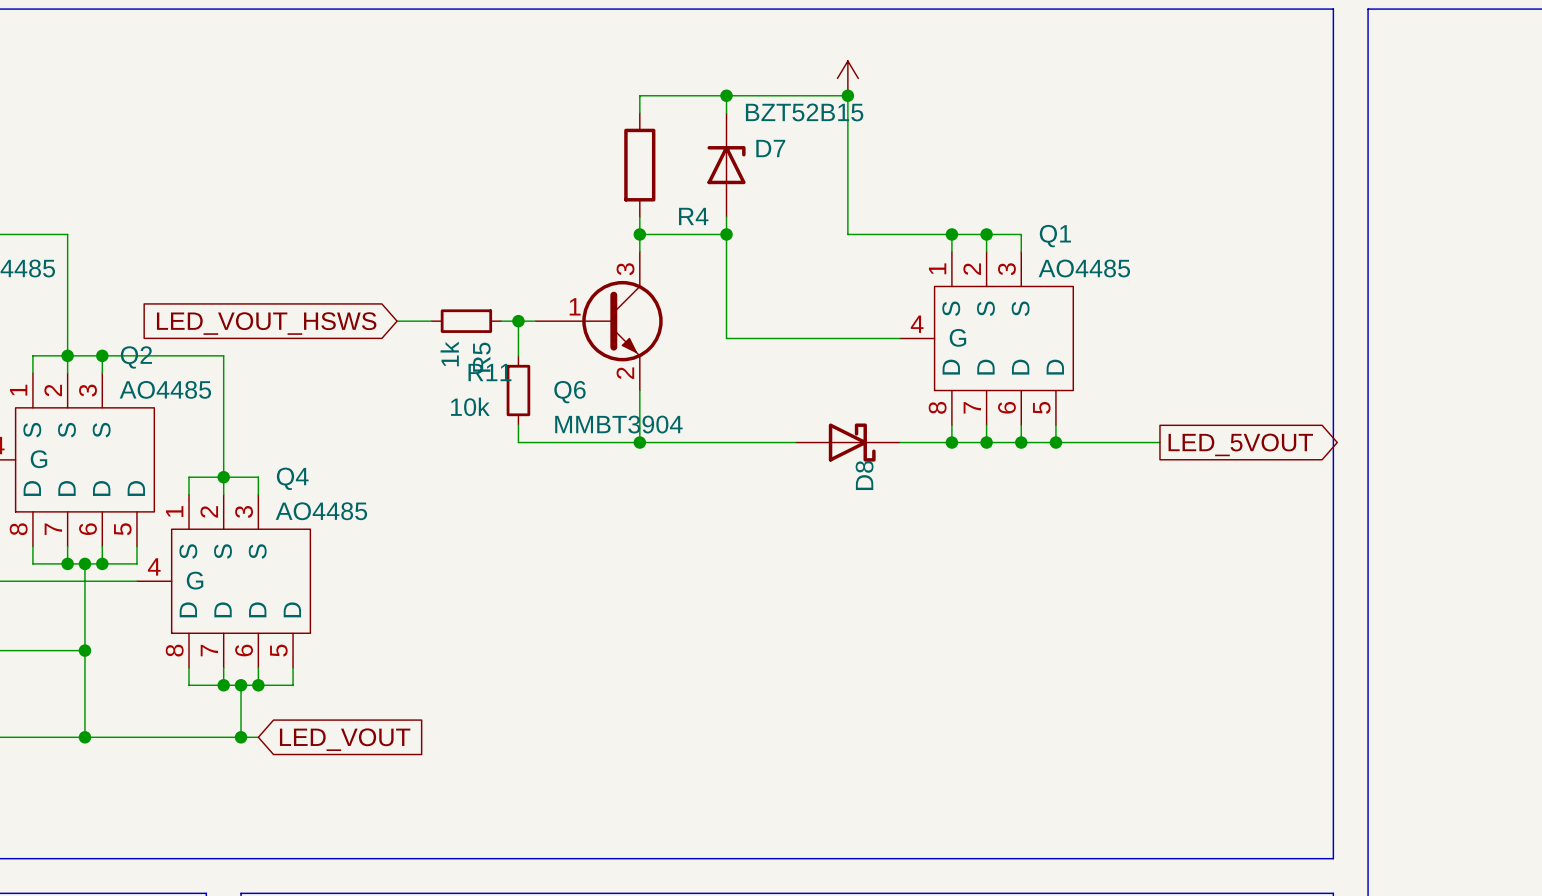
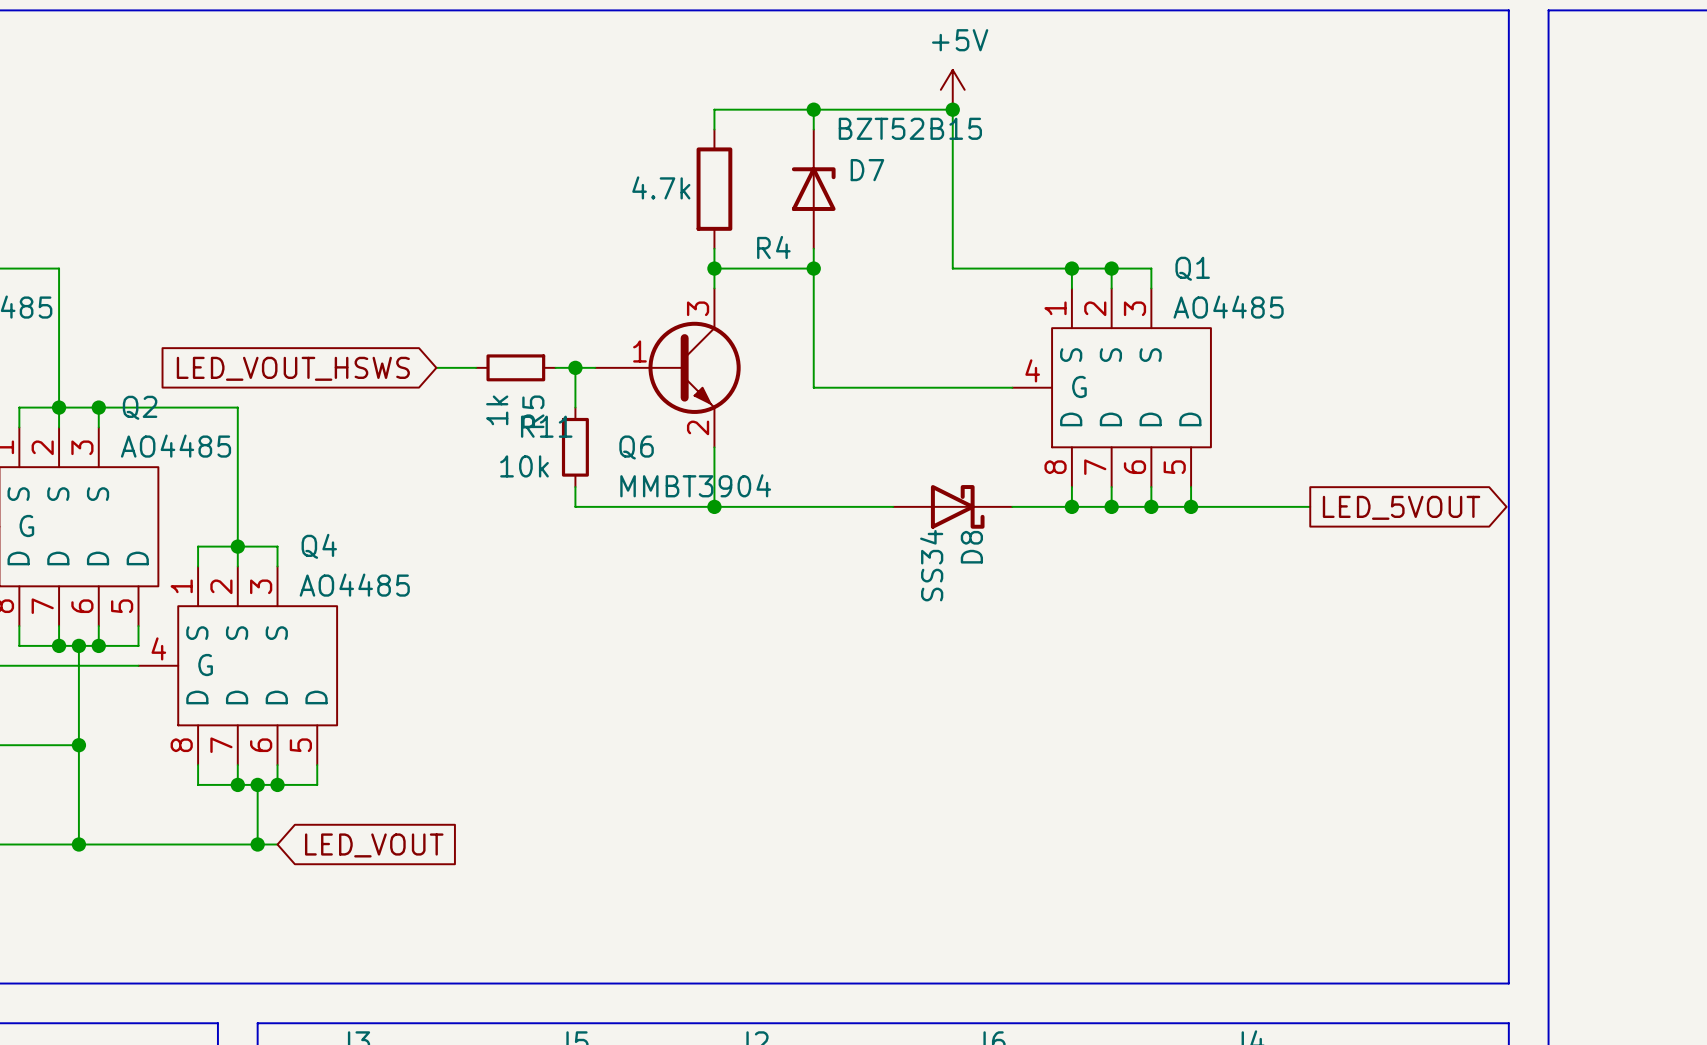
power symbol text: none -> +5V (960, 40)
R4 value: none -> 4.7k (661, 187)
D8 value: none -> SS34 (931, 565)

